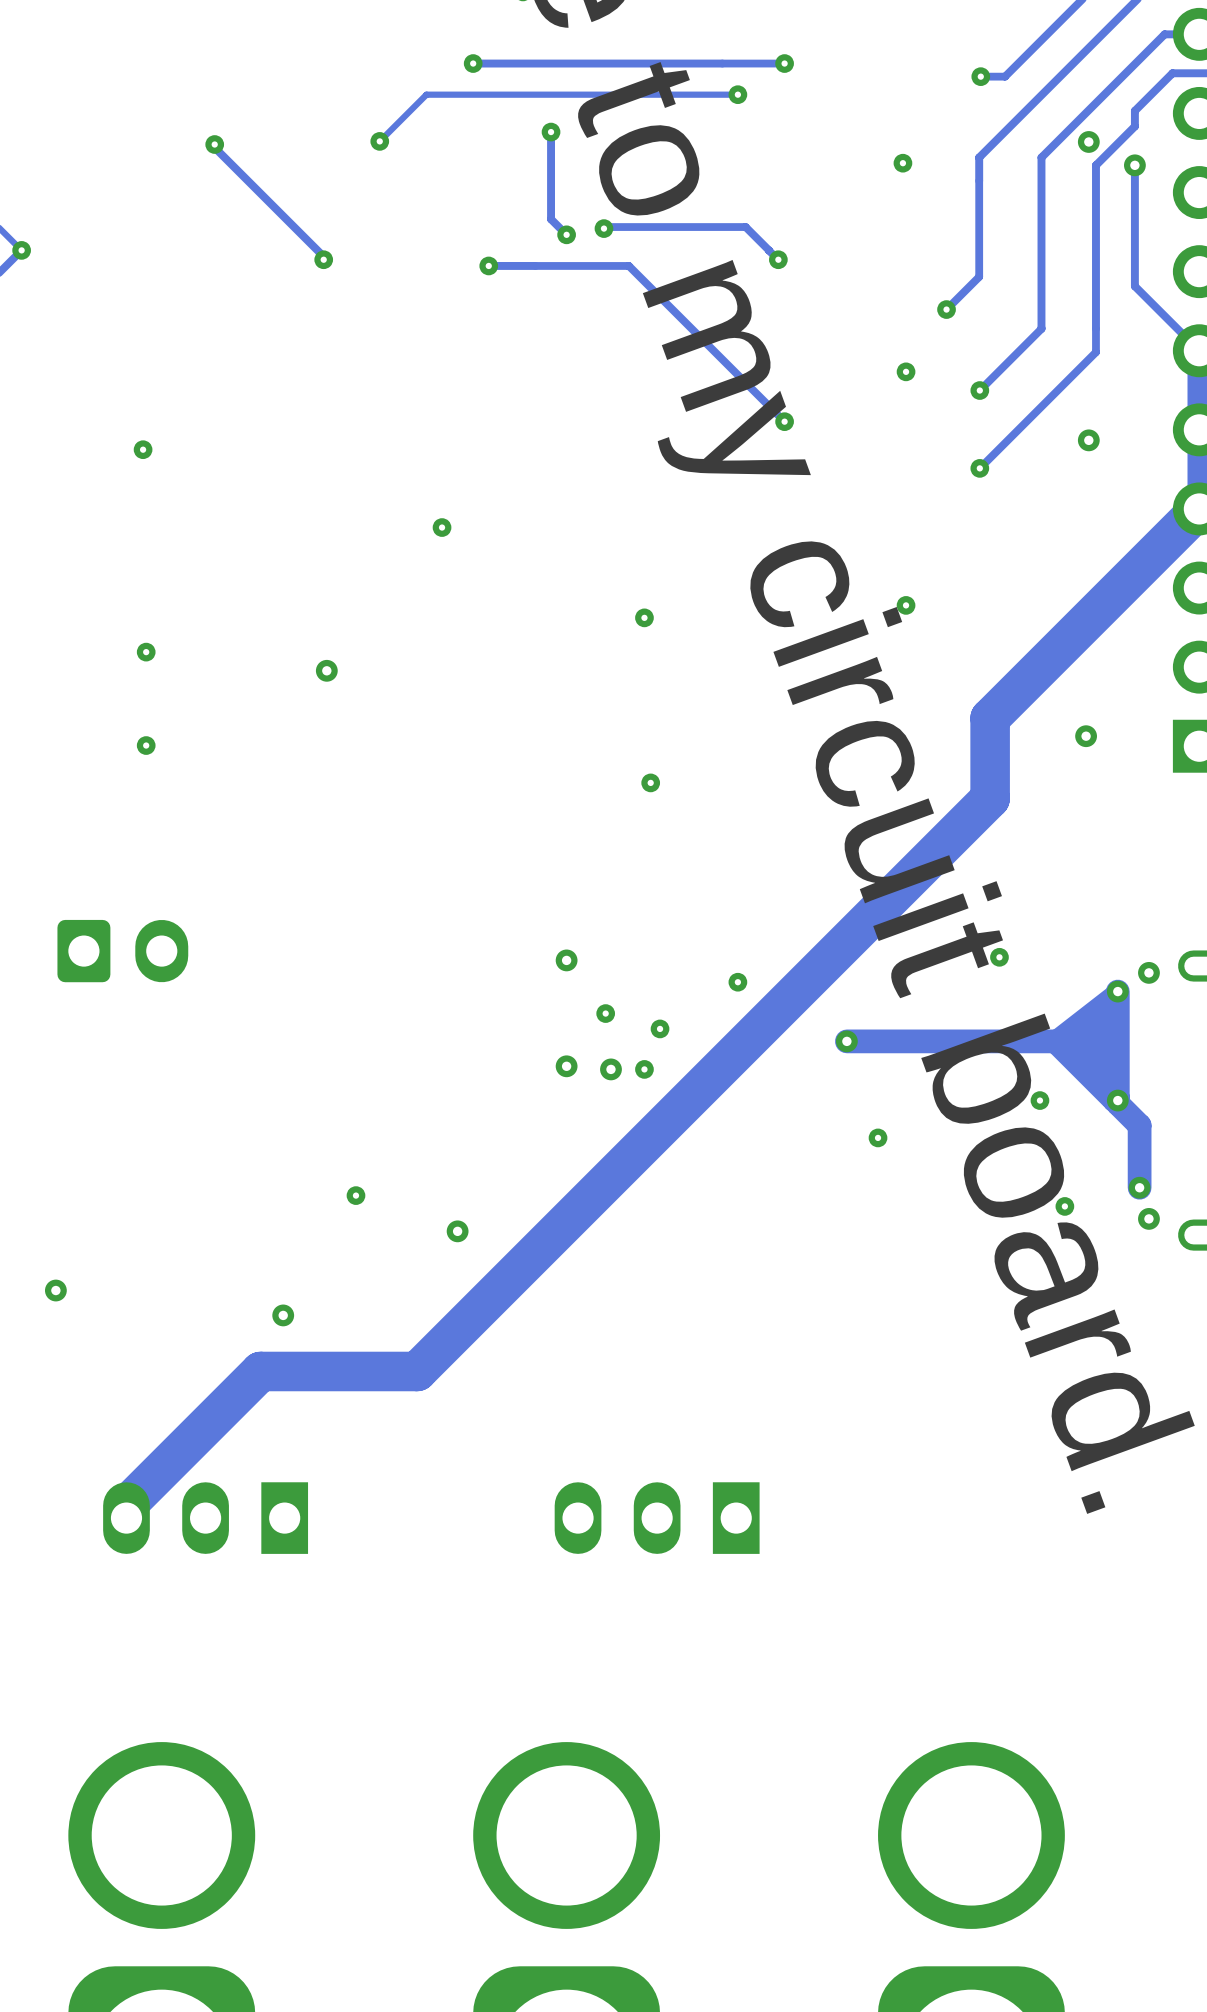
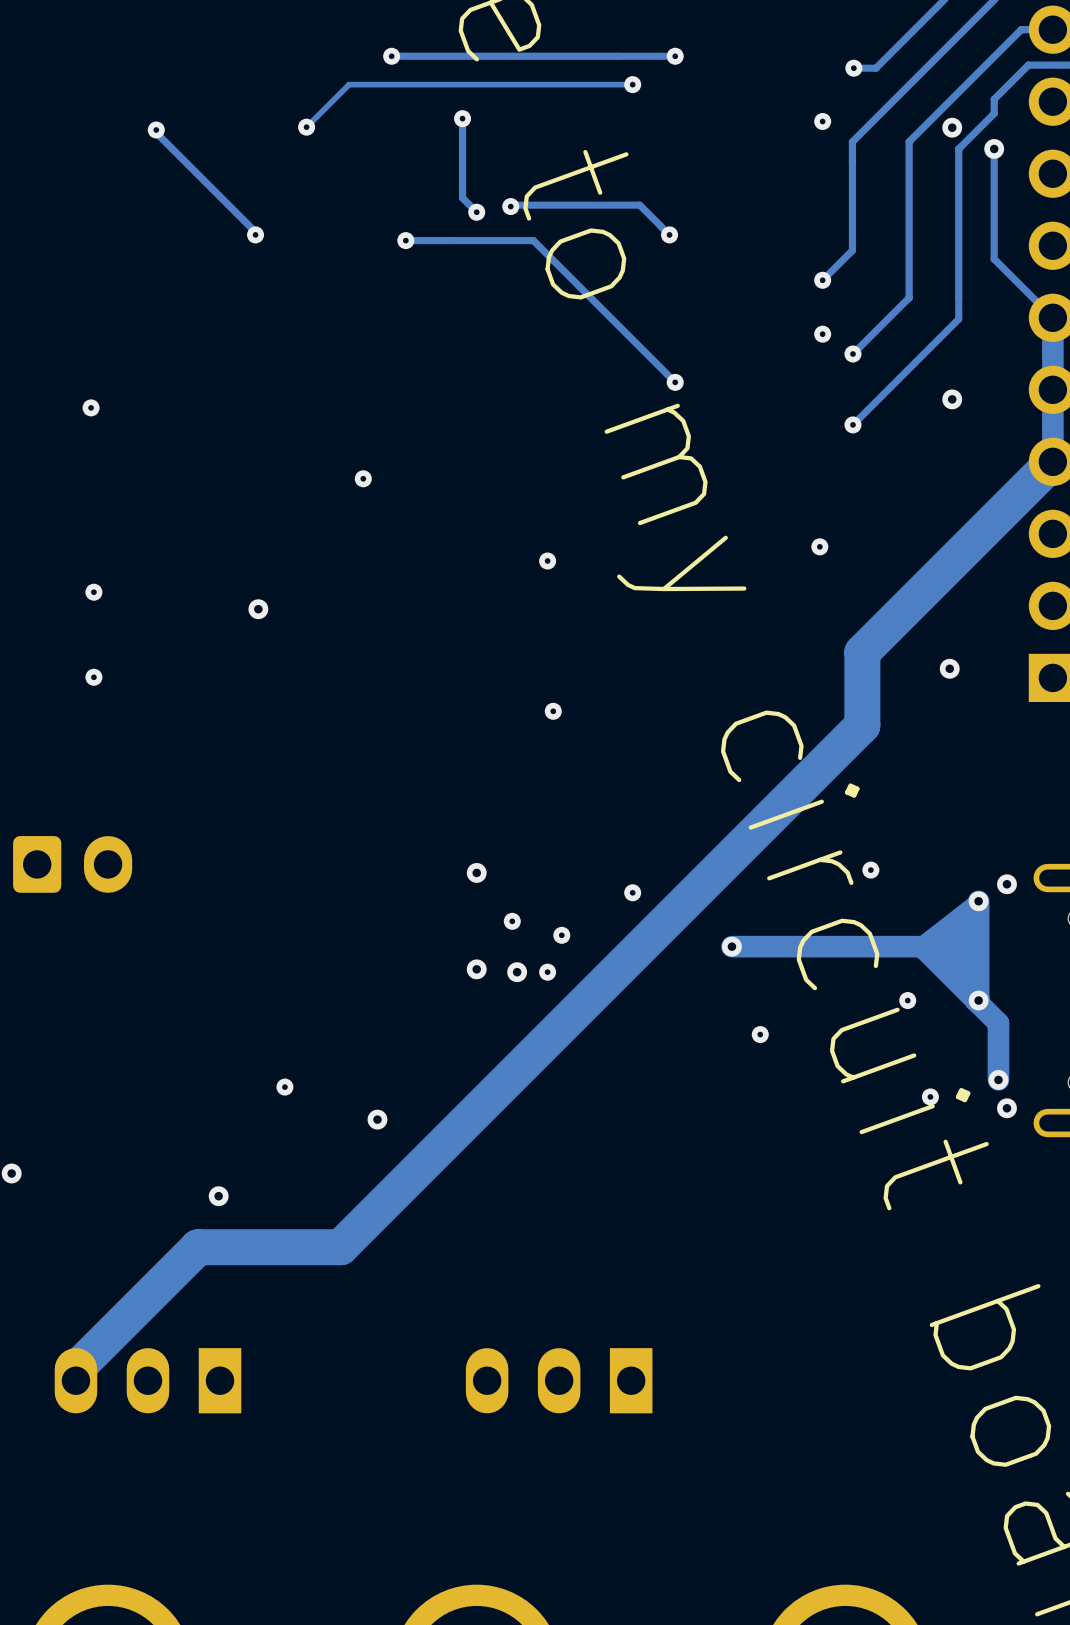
via position: (902, 163) -> (822, 121)
via position: (906, 371) -> (822, 334)
via position: (906, 605) -> (819, 546)

